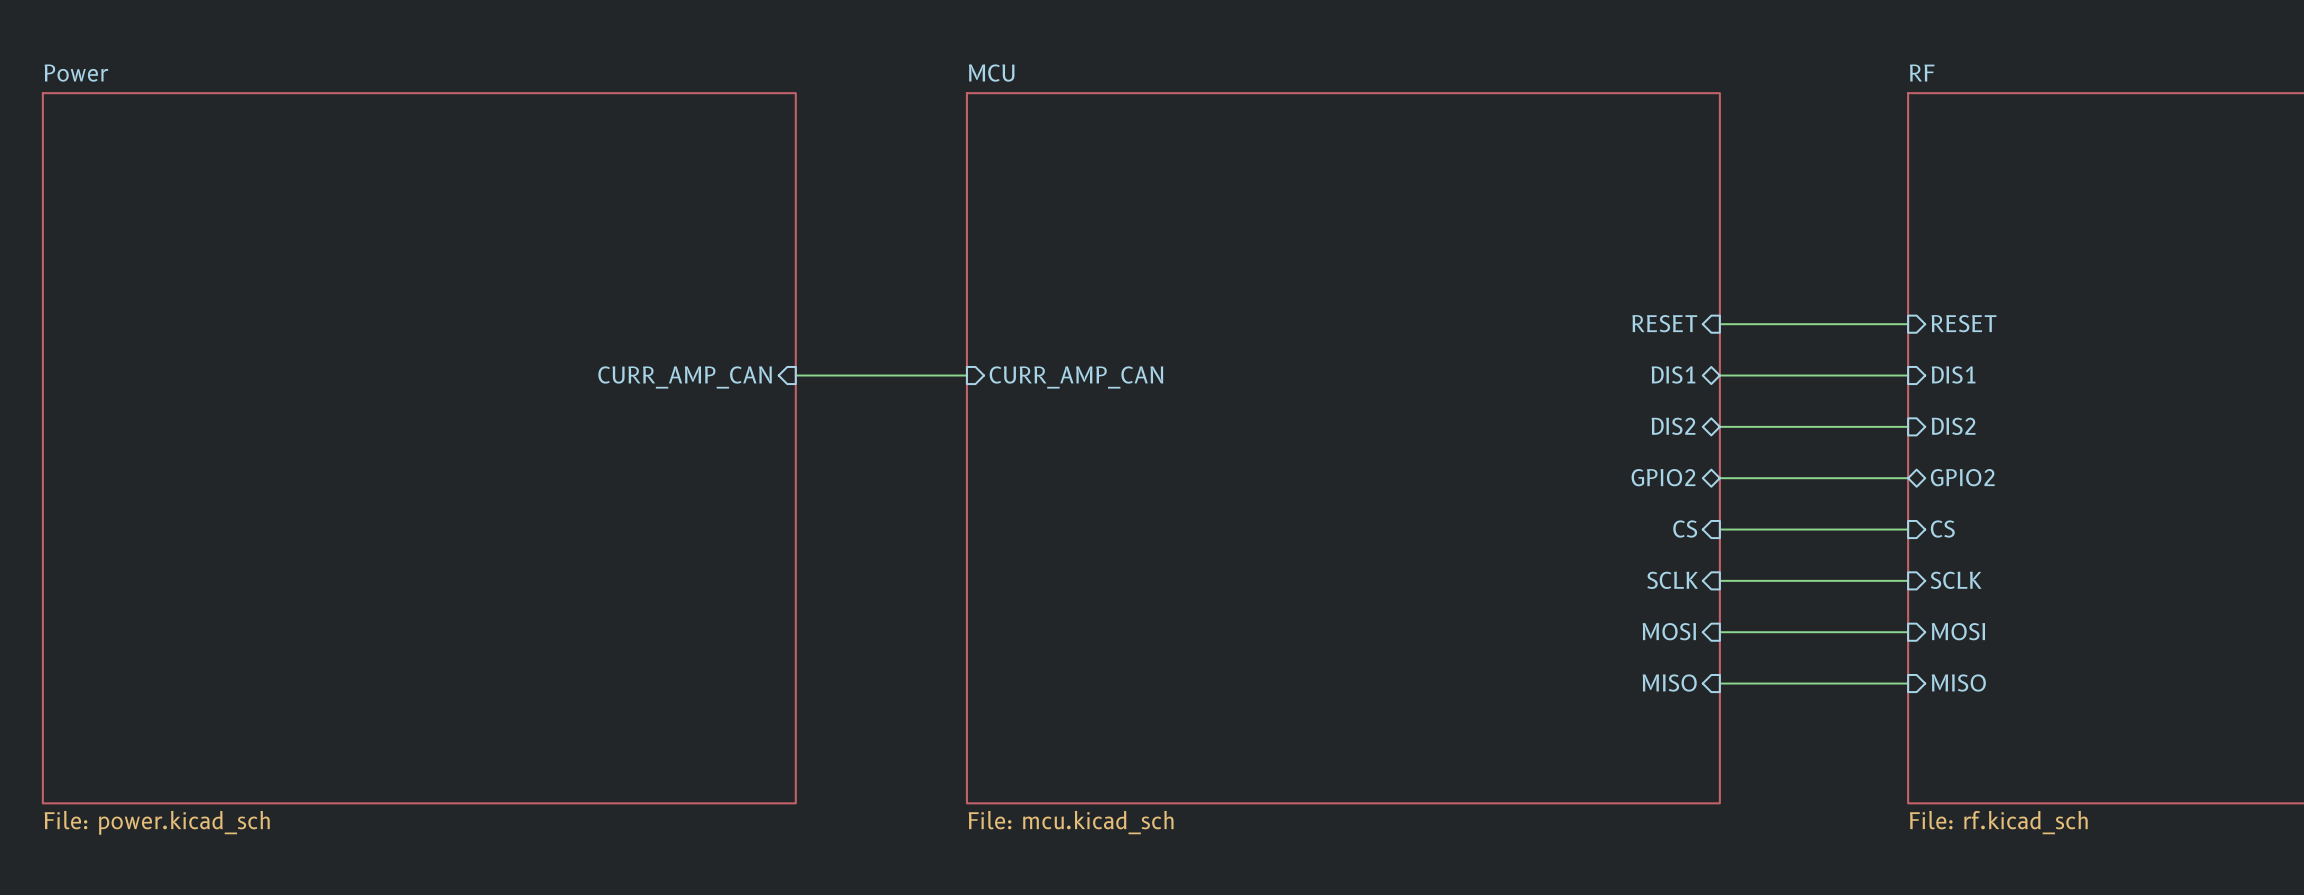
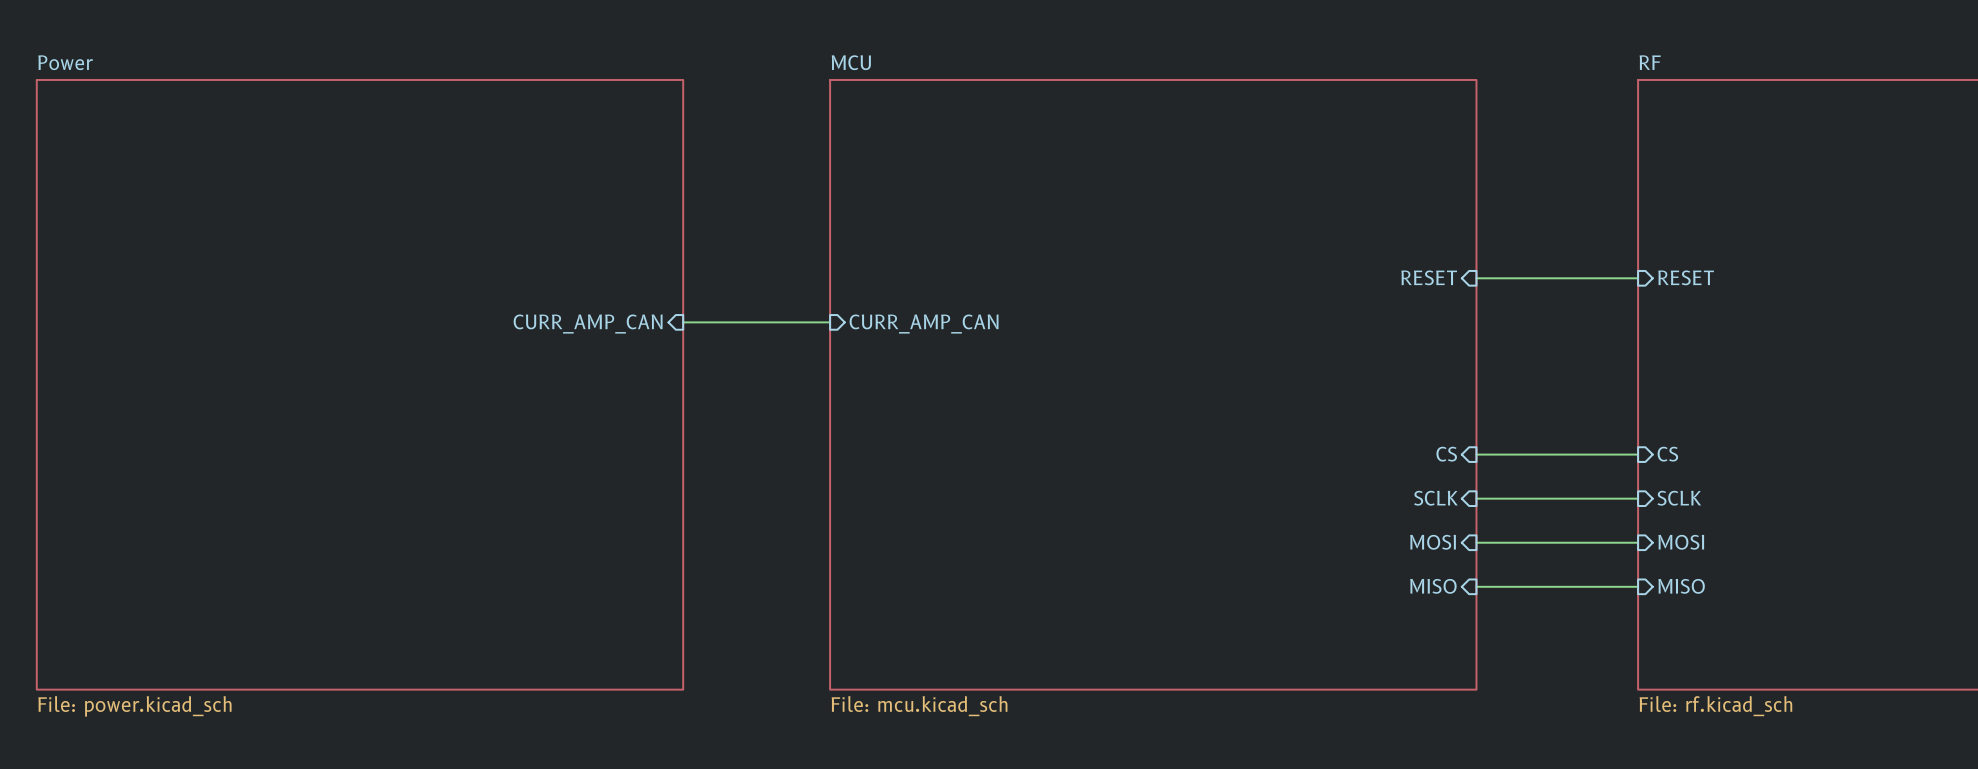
sheet pin: DIS1 (1673, 374) -> none
sheet pin: DIS1 (1953, 374) -> none
wire: (1719, 375) (1908, 375) -> none
sheet pin: DIS2 (1673, 426) -> none
wire: (1719, 426) (1908, 426) -> none
sheet pin: DIS2 (1953, 426) -> none
sheet pin: GPIO2 (1663, 477) -> none
sheet pin: GPIO2 (1962, 477) -> none
wire: (1719, 478) (1908, 478) -> none

